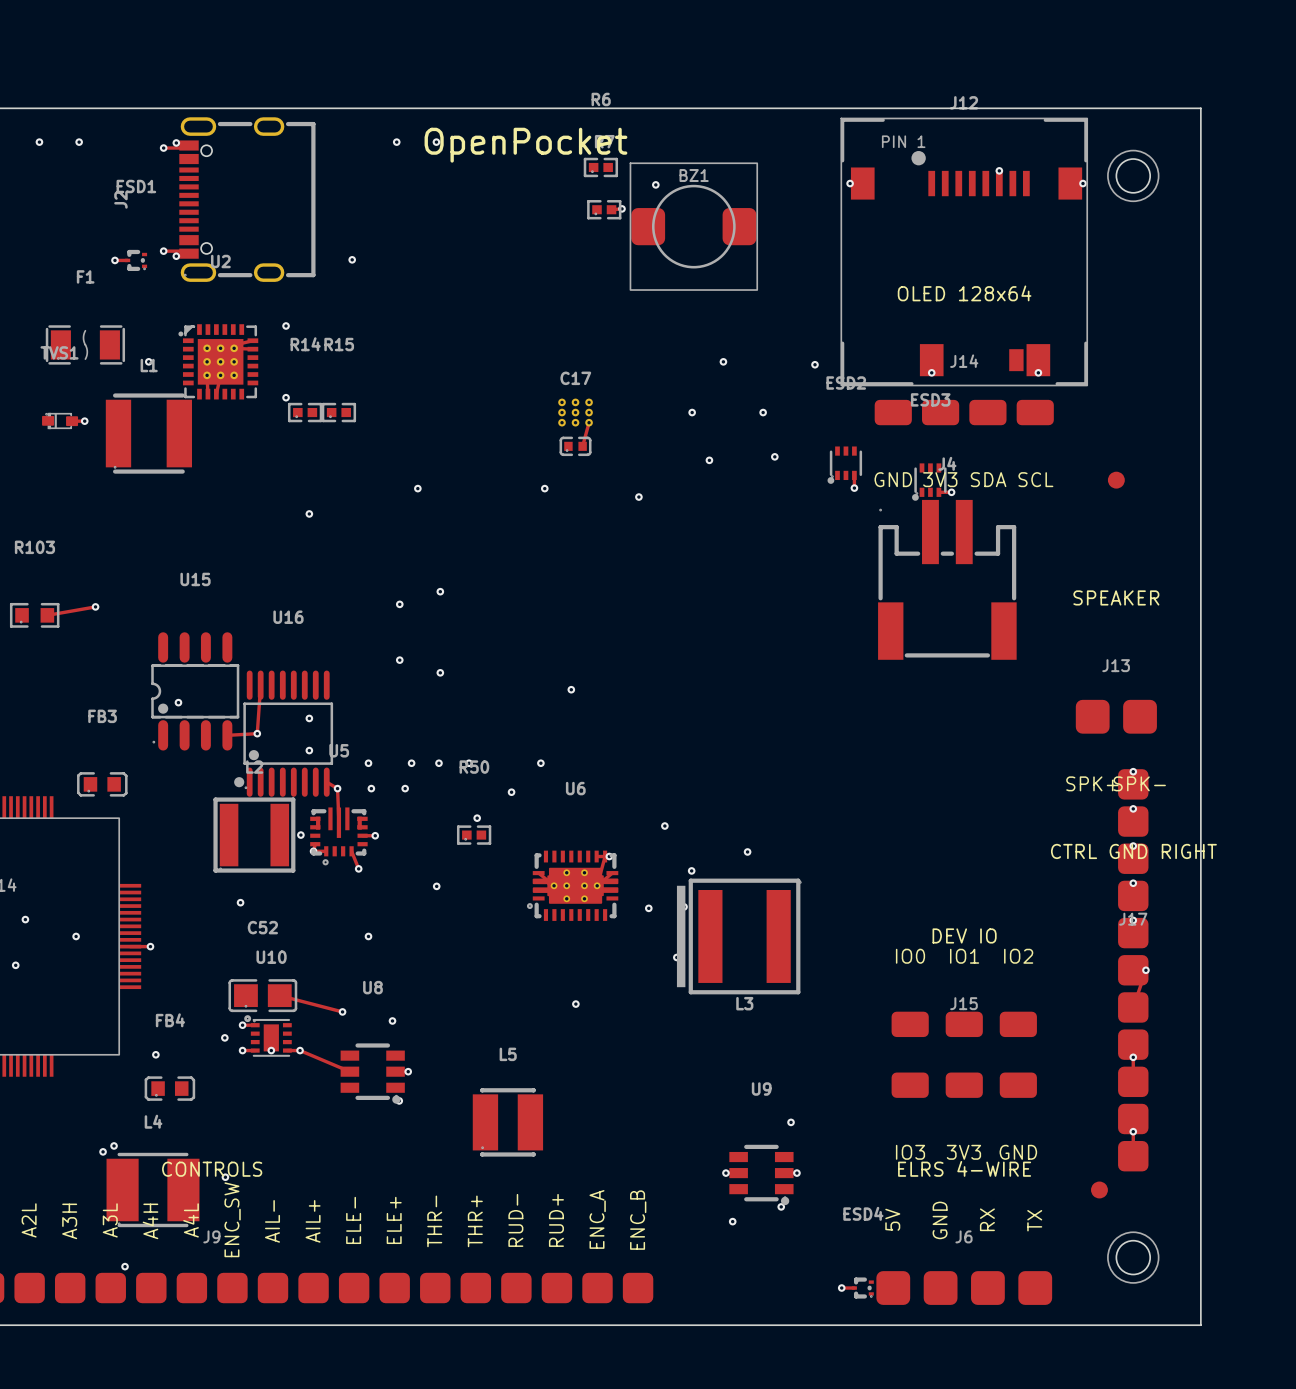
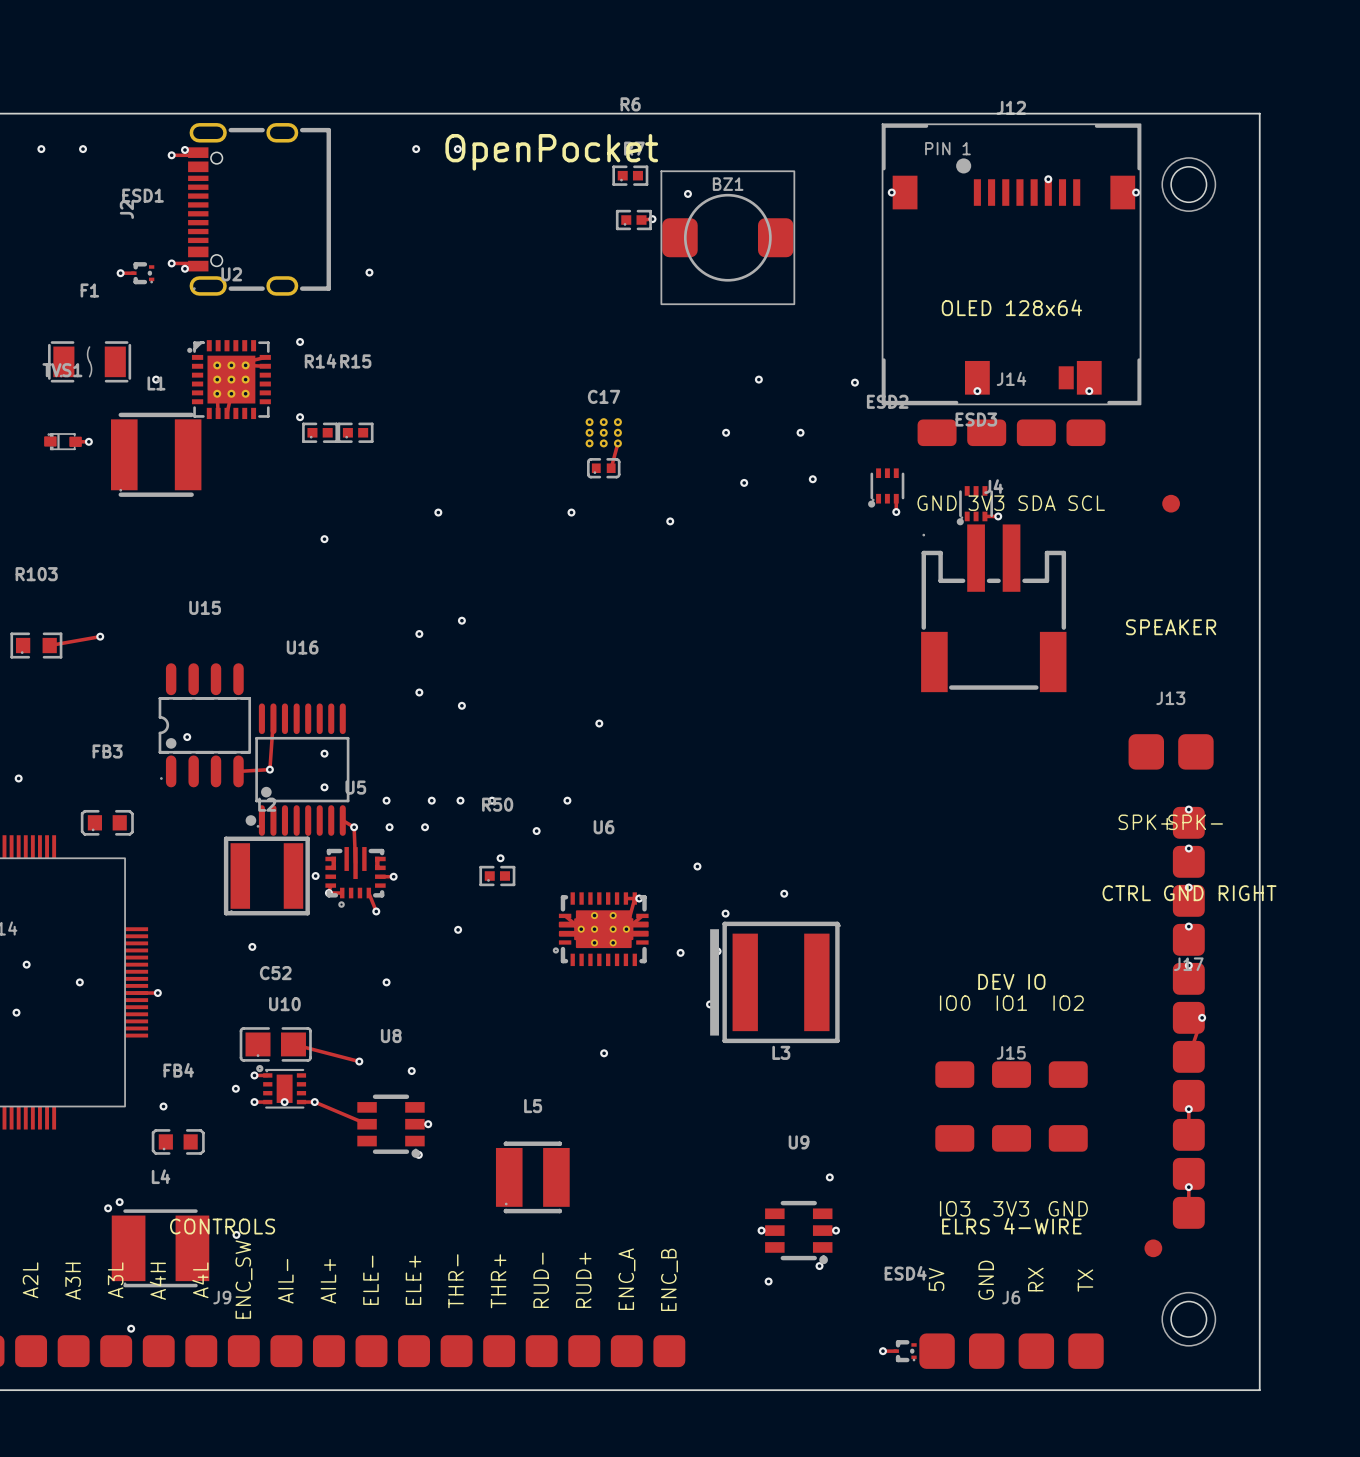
via: none -> (18, 778)

